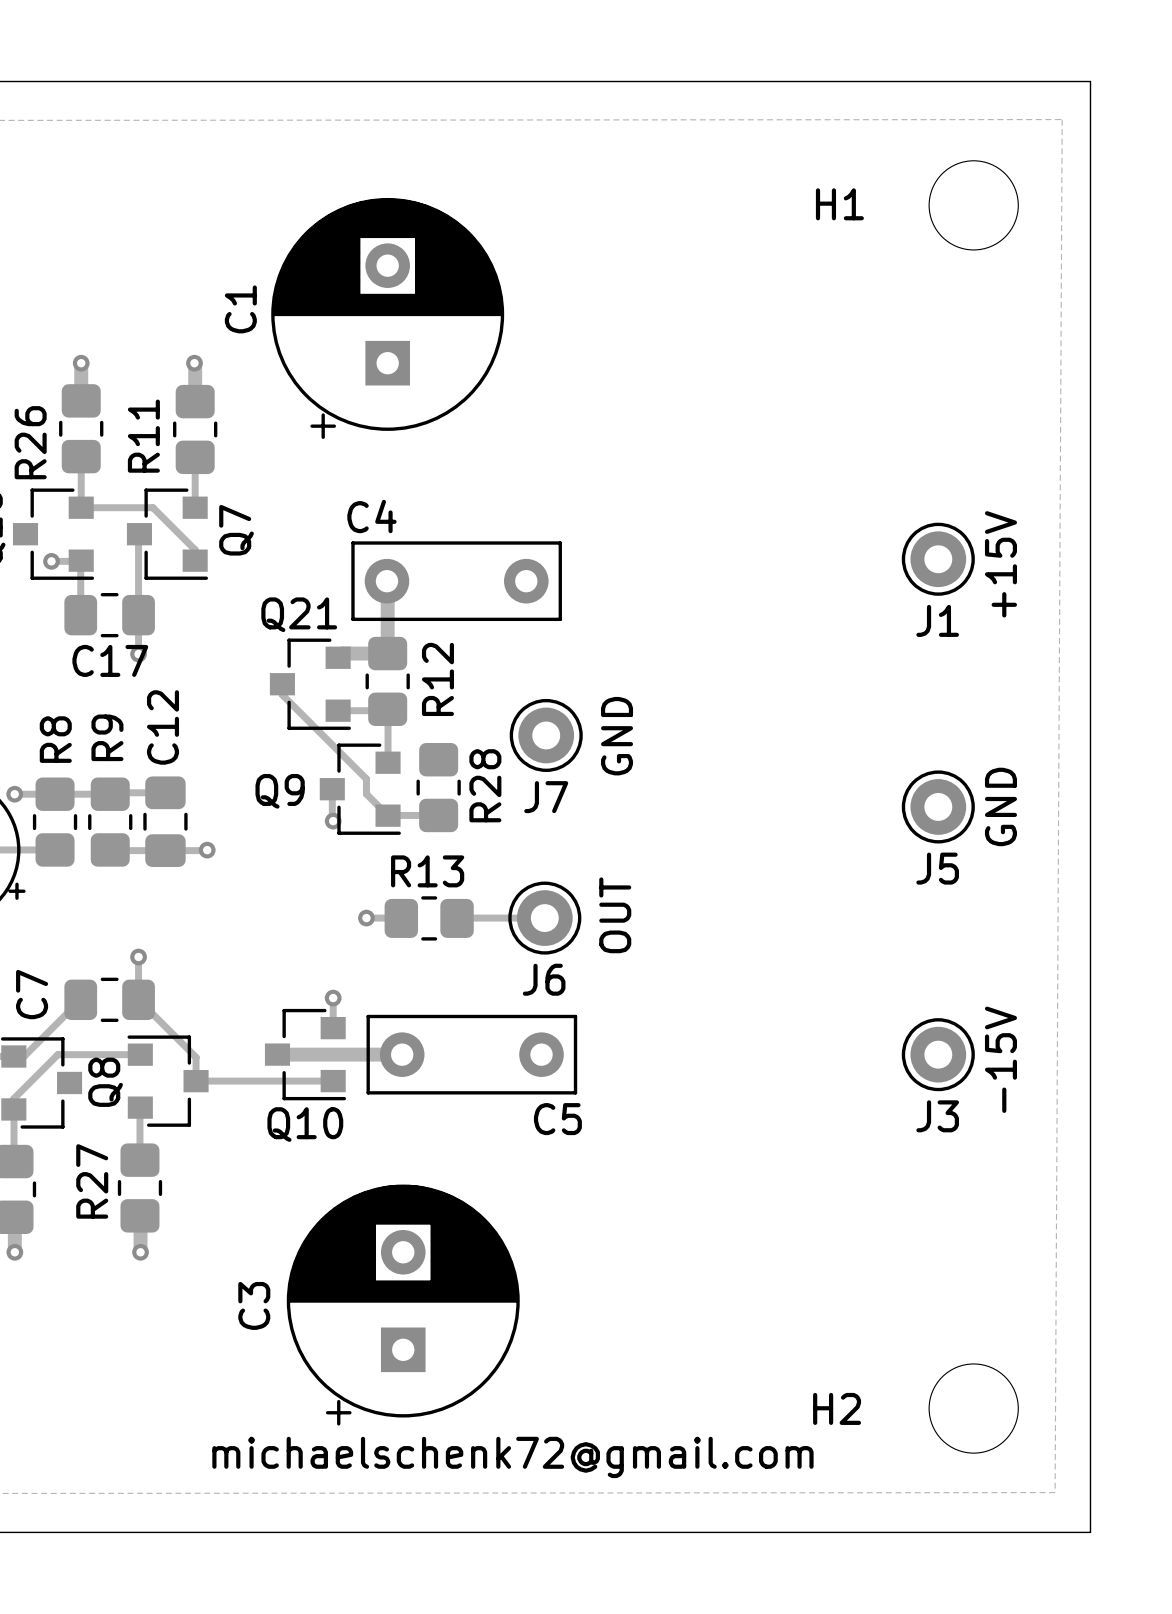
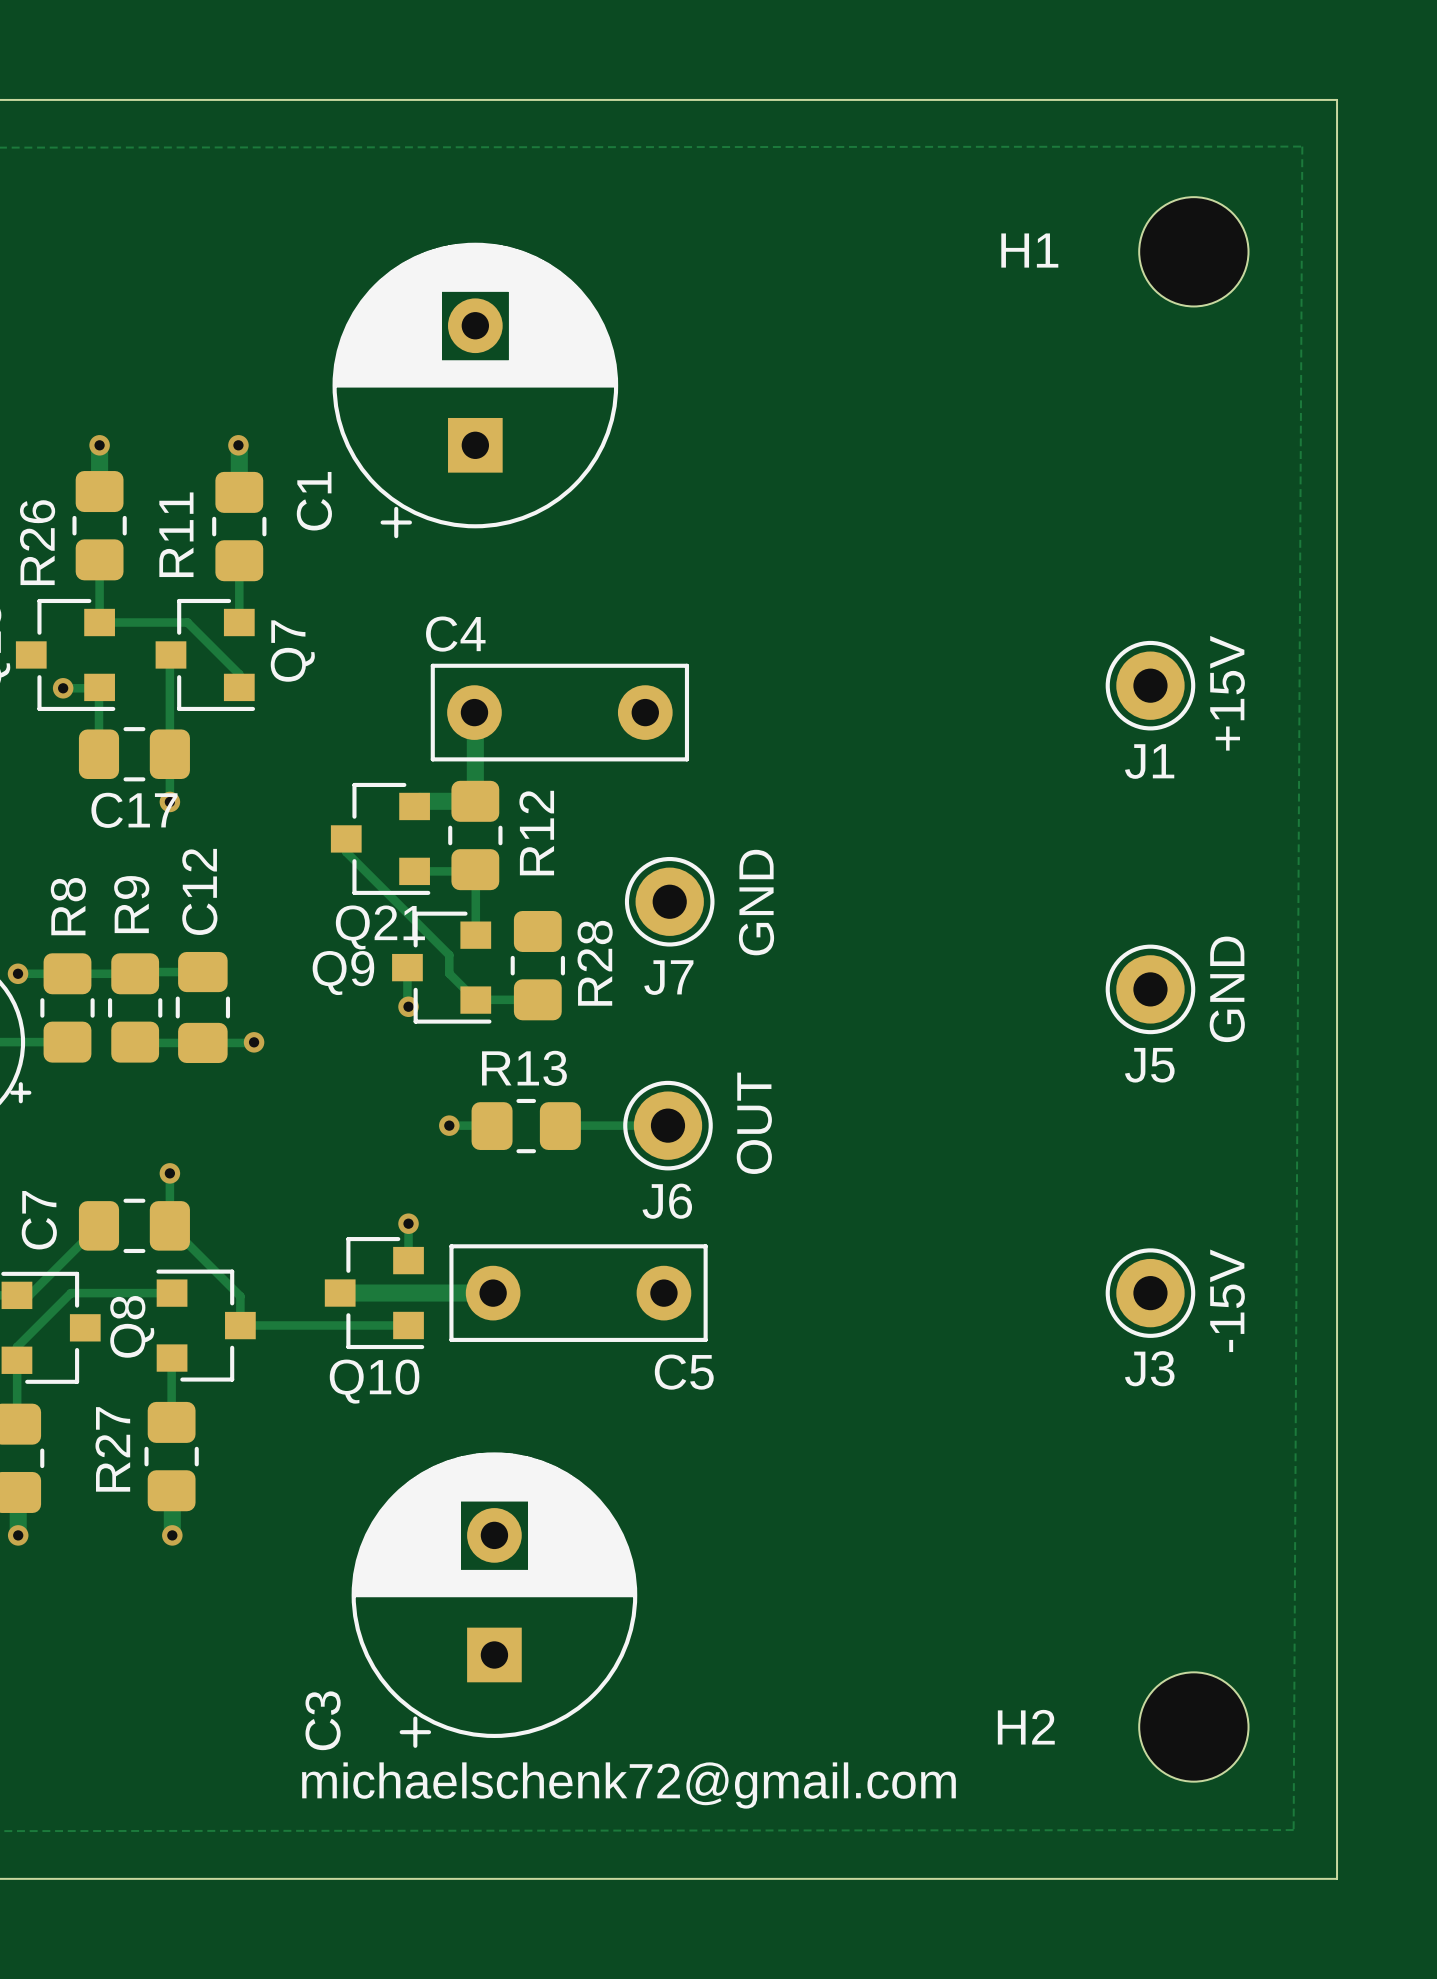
C1 name position: C1 (240, 309) -> C1 (314, 501)
Q21 name position: Q21 (299, 614) -> Q21 (380, 927)
C3 name position: C3 (254, 1305) -> C3 (323, 1720)

